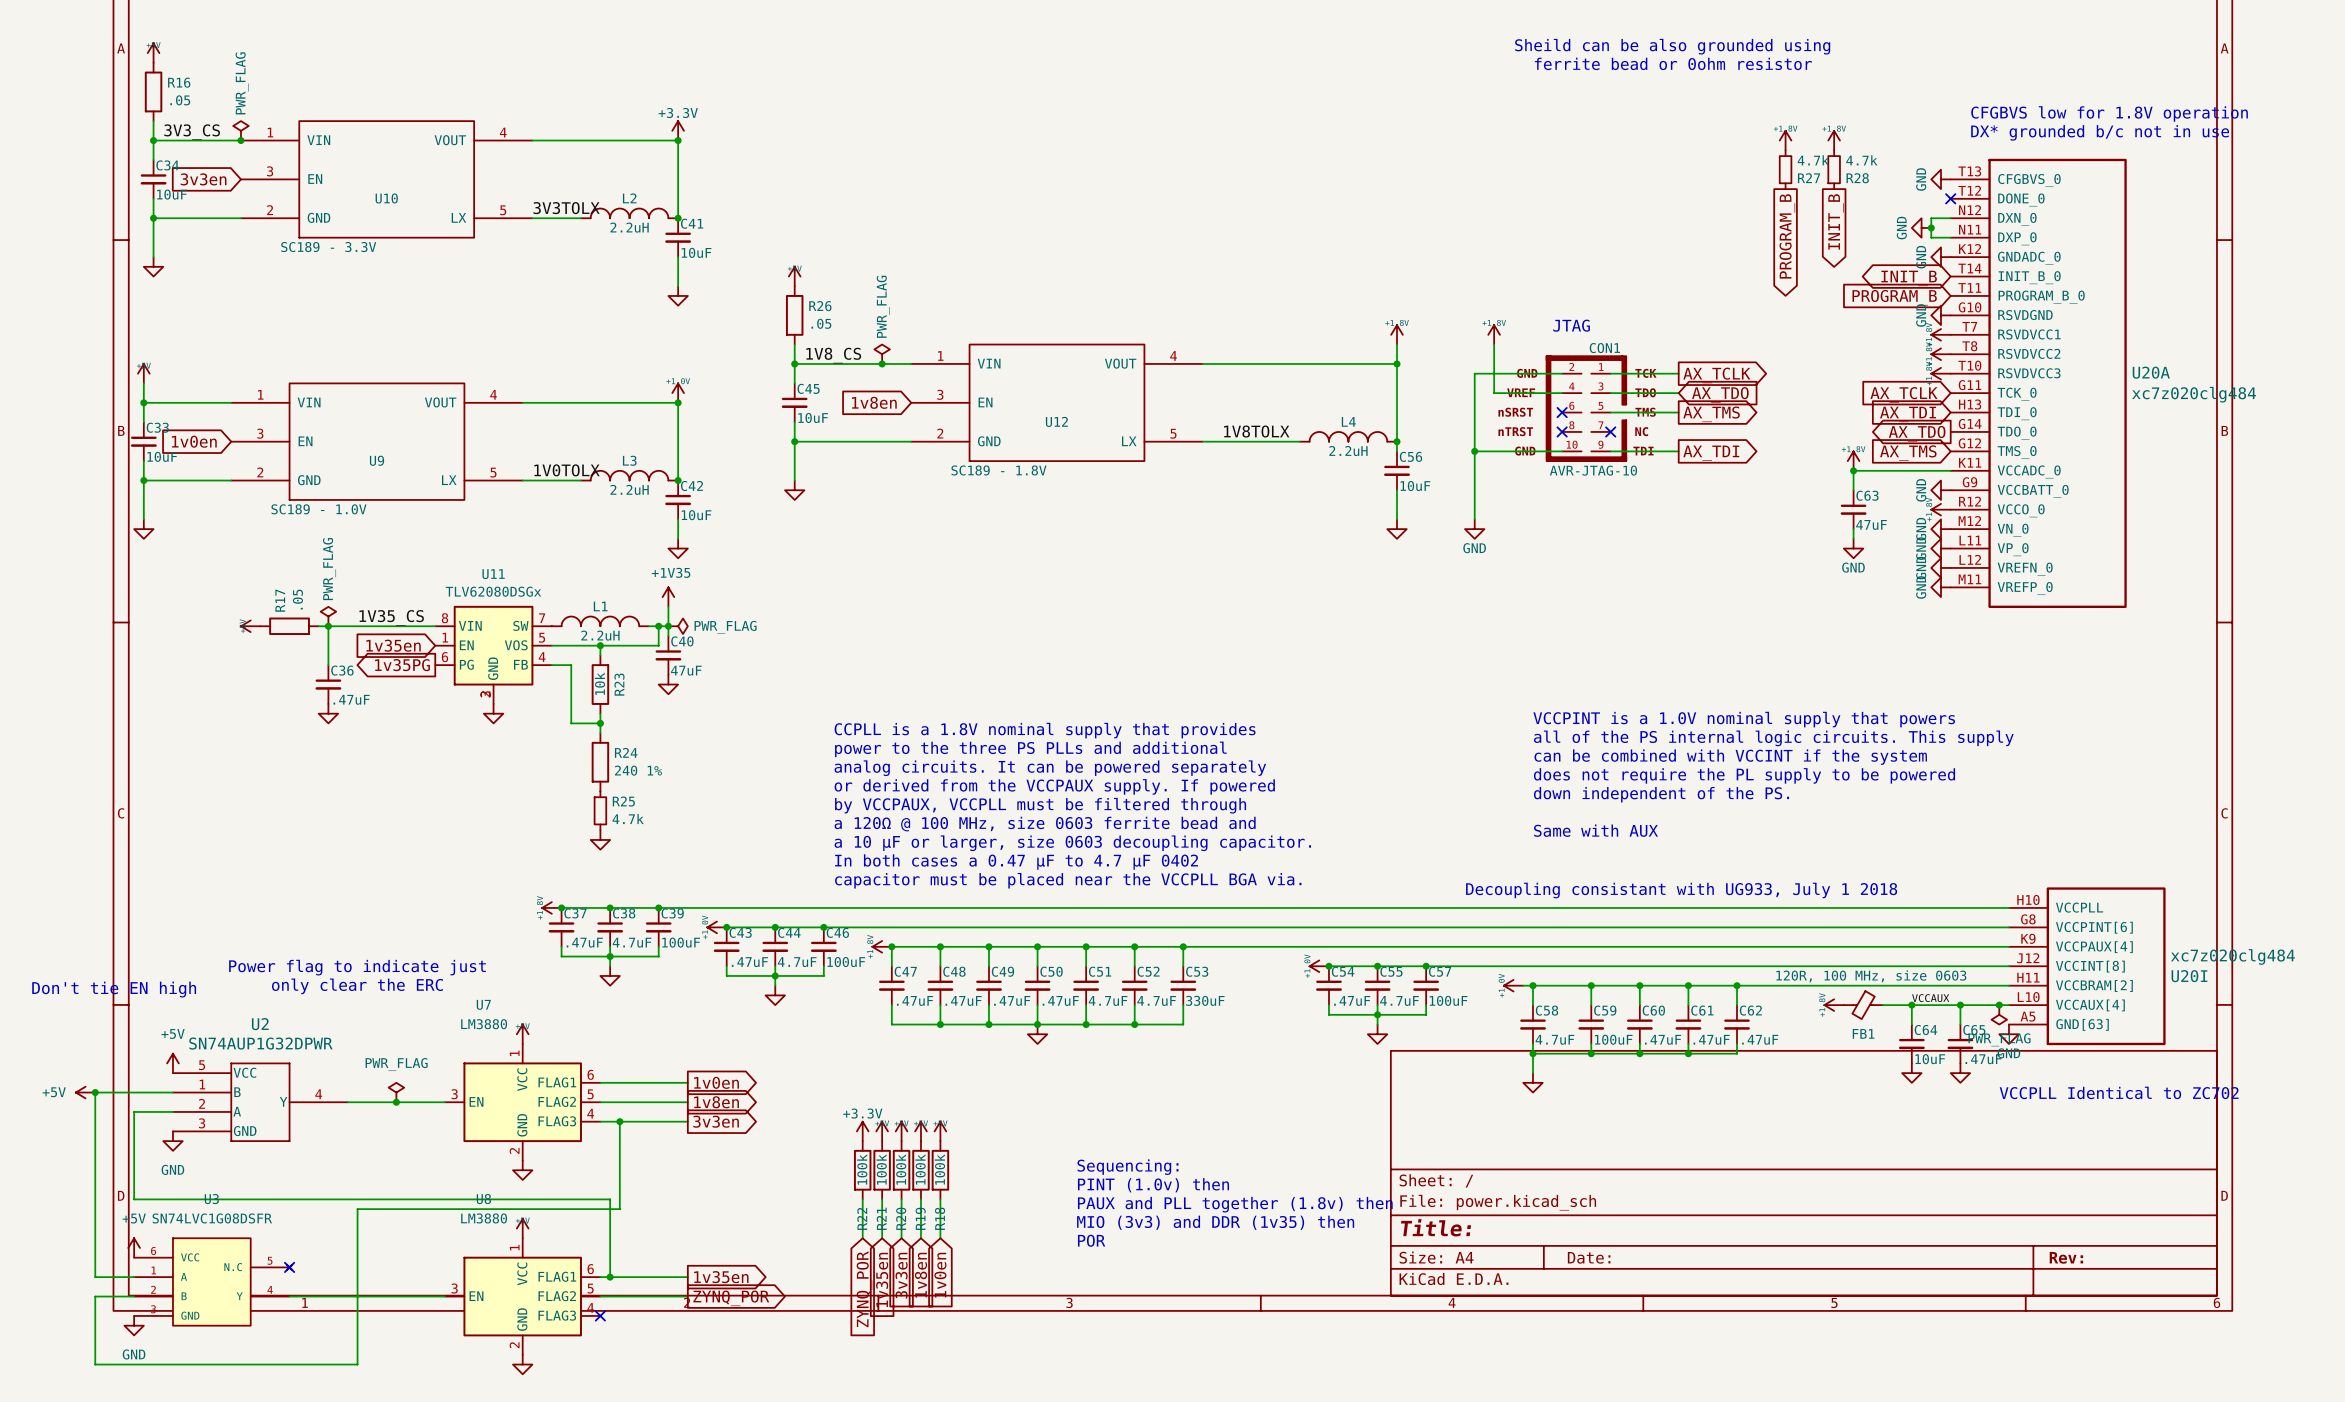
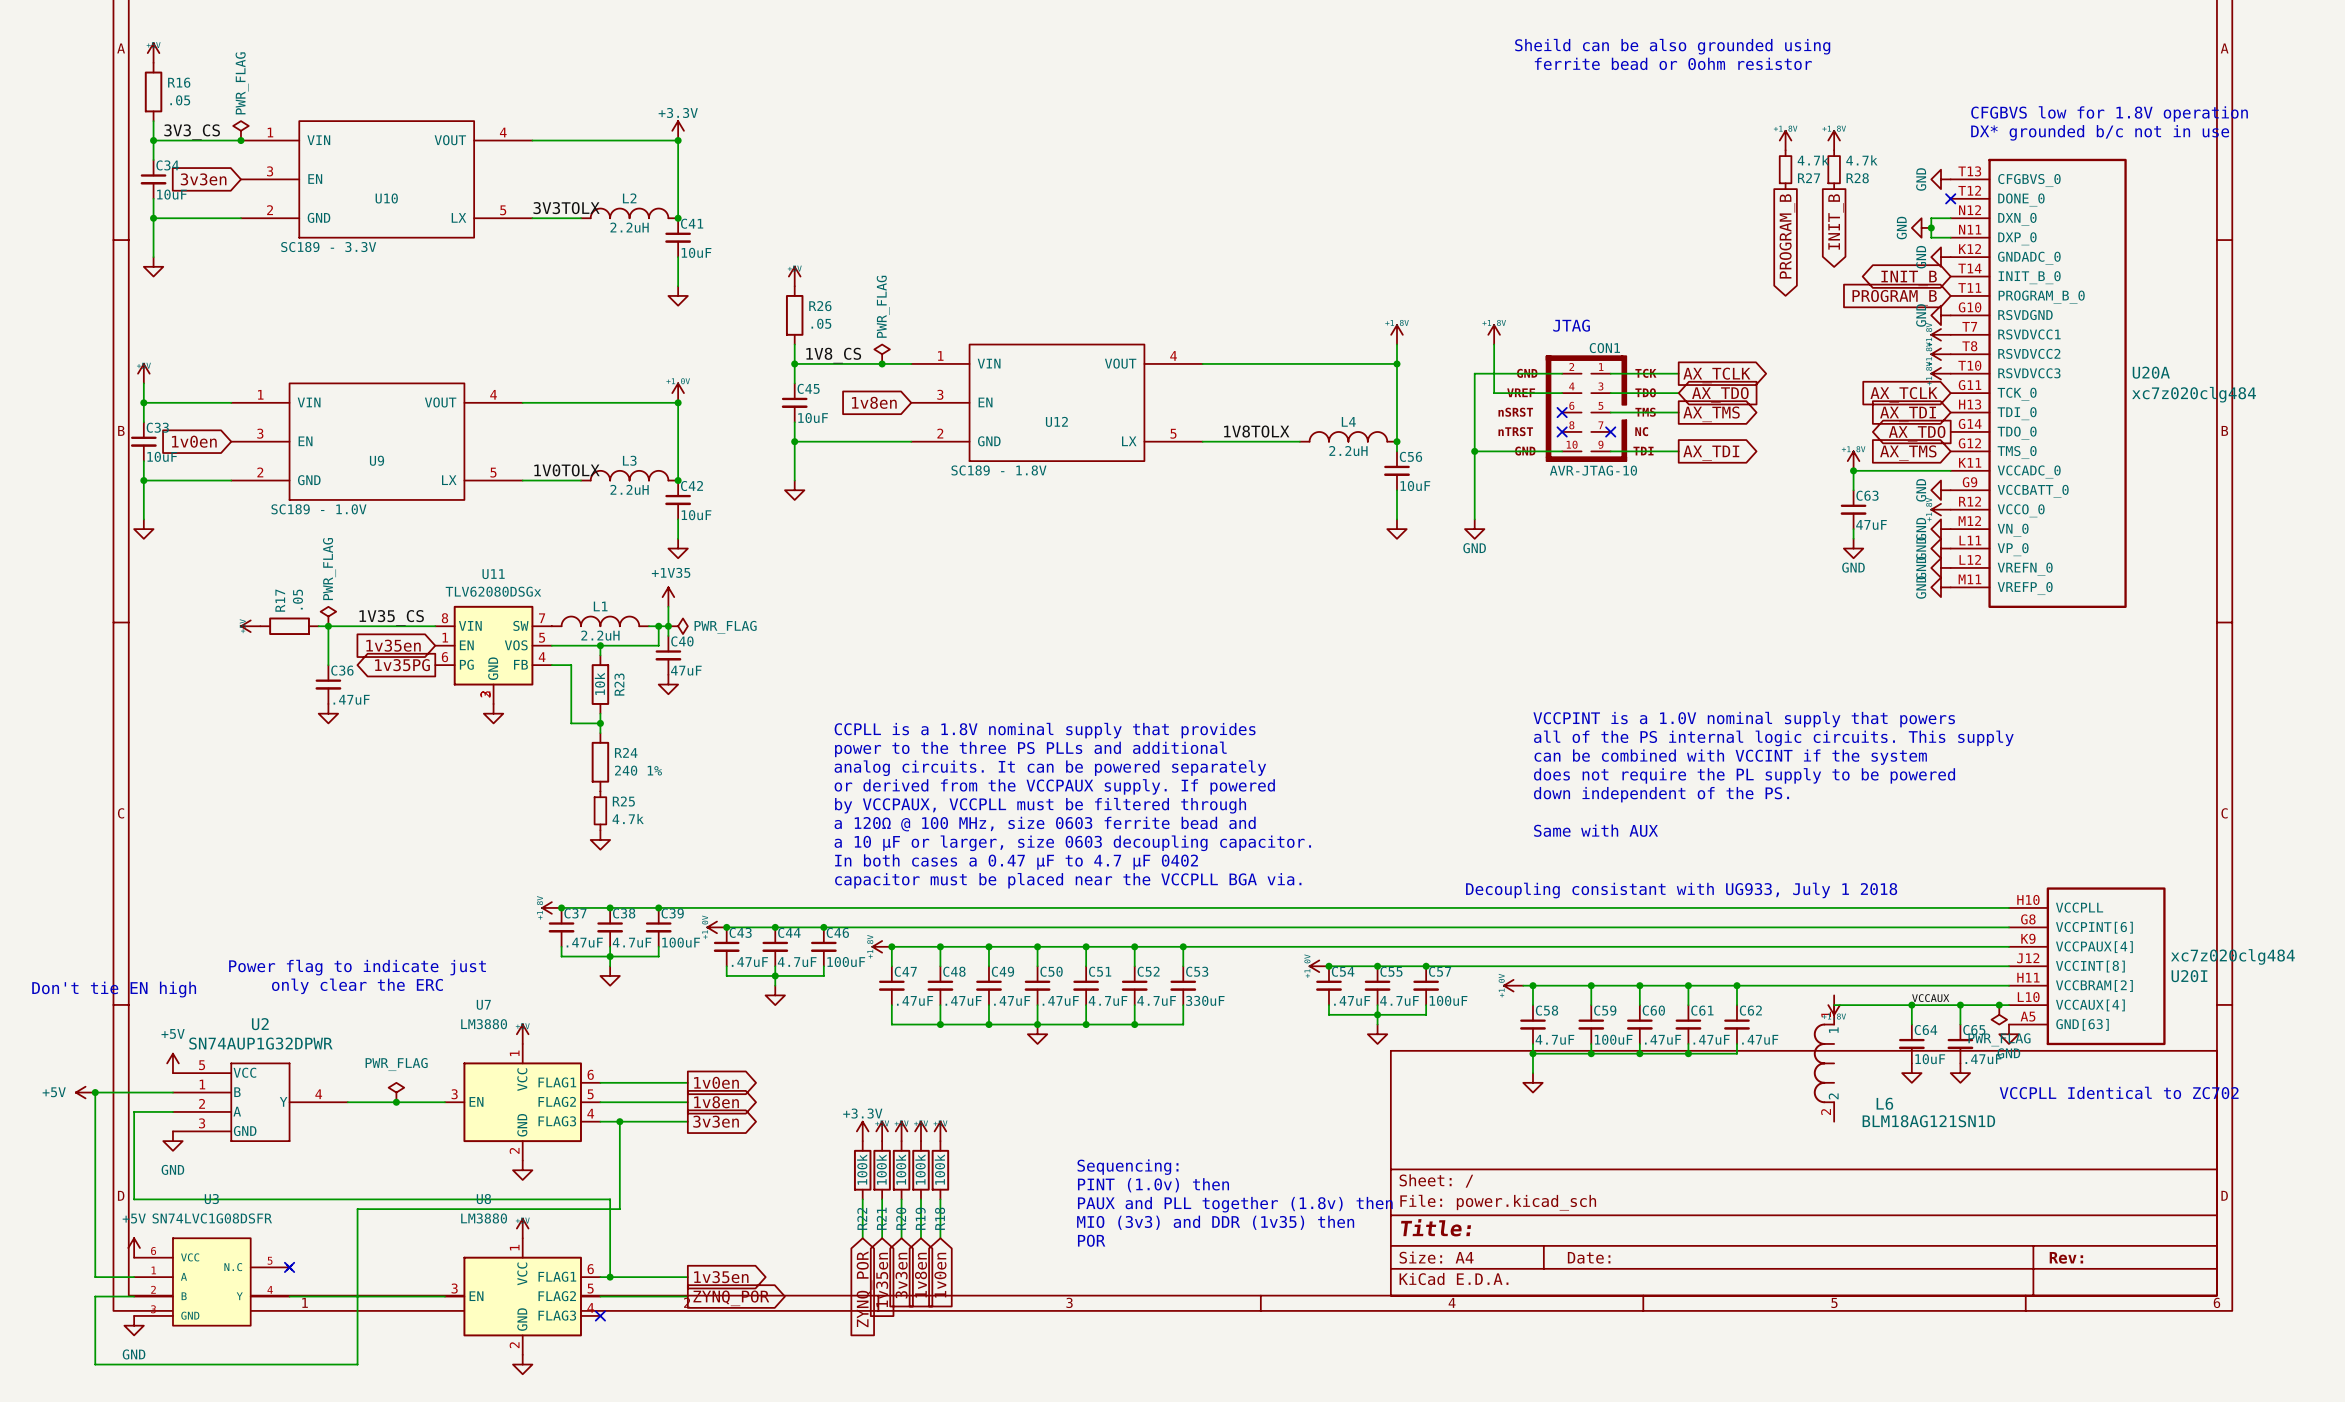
power symbol rotation: 0° (1834, 1005) -> 90° counterclockwise (1834, 1005)
FB1: 120R, 100 MHz, size 0603 (1863, 1005) -> none
L6: none -> BLM18AG121SN1D (1824, 1063)

